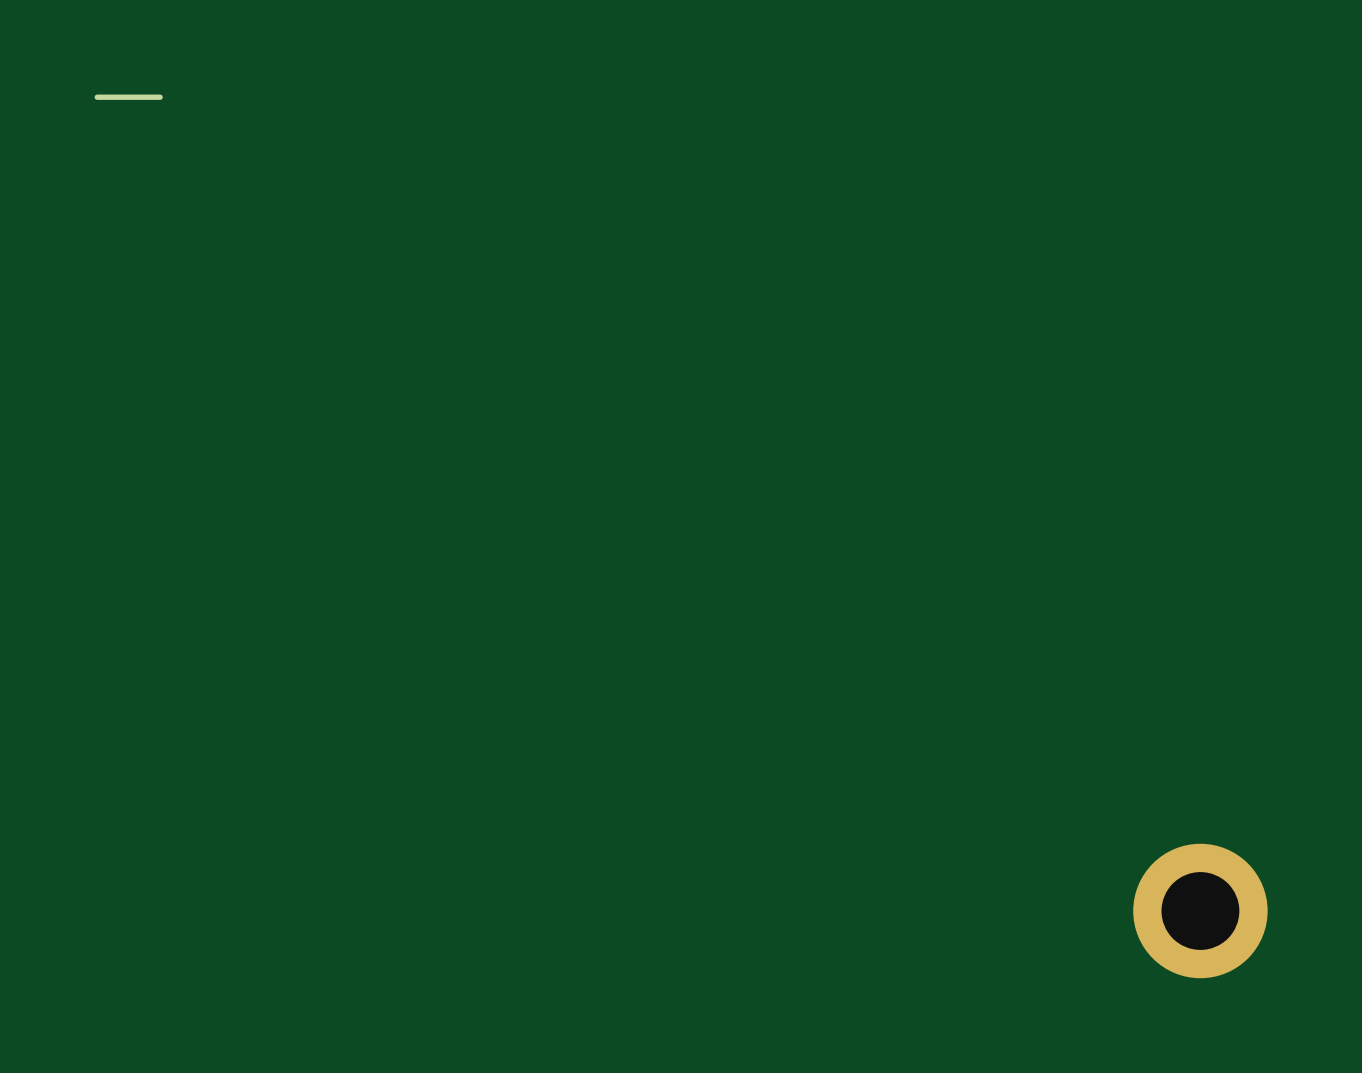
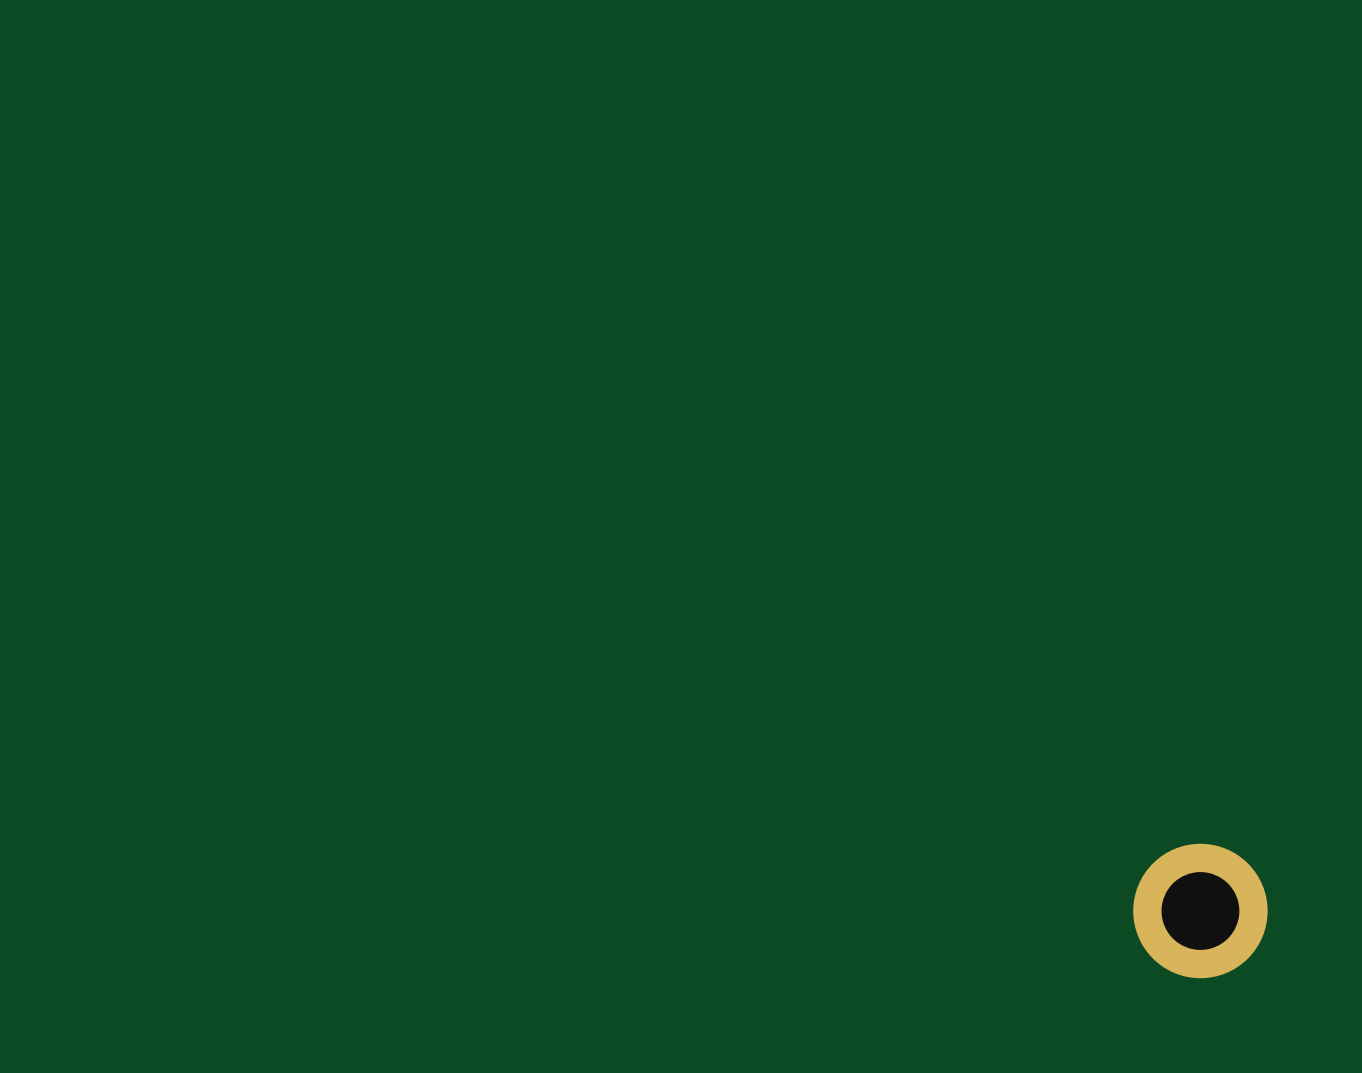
board edge: (160, 97) (97, 97) -> none

